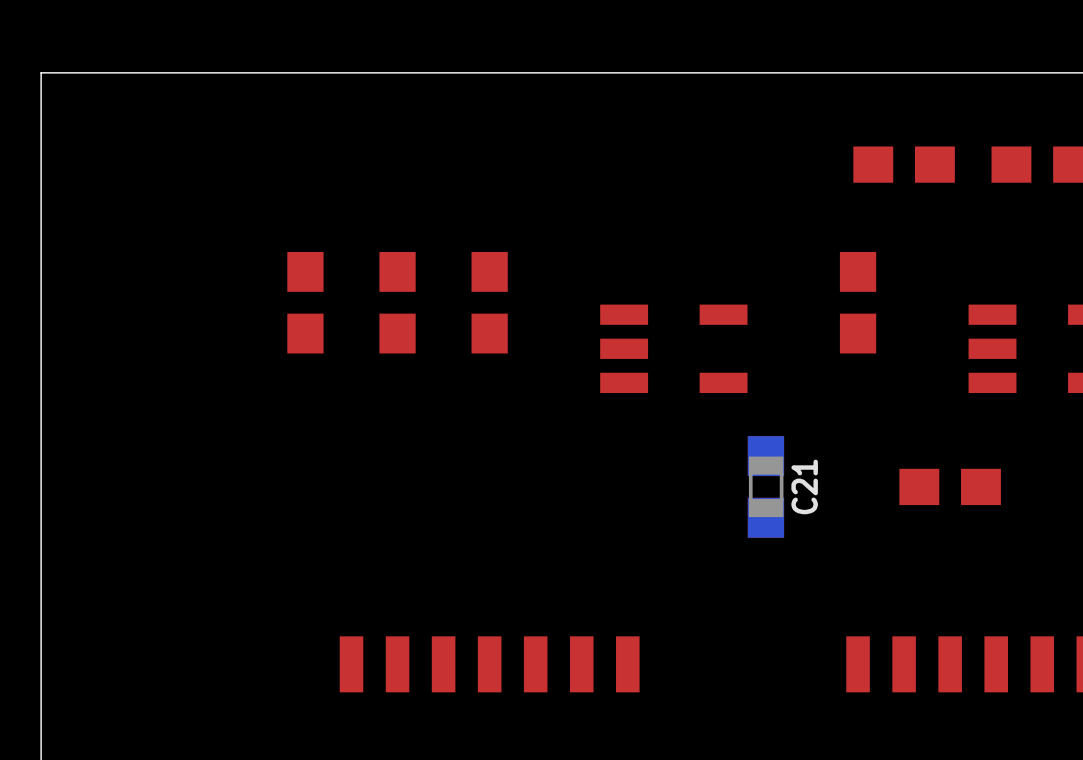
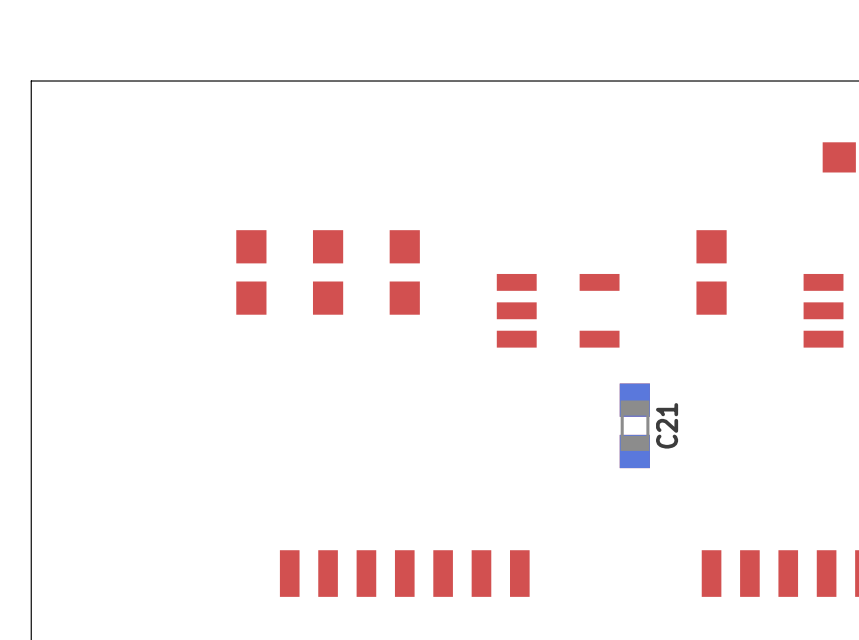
part: (904, 164) -> none
part: (950, 486) -> none

